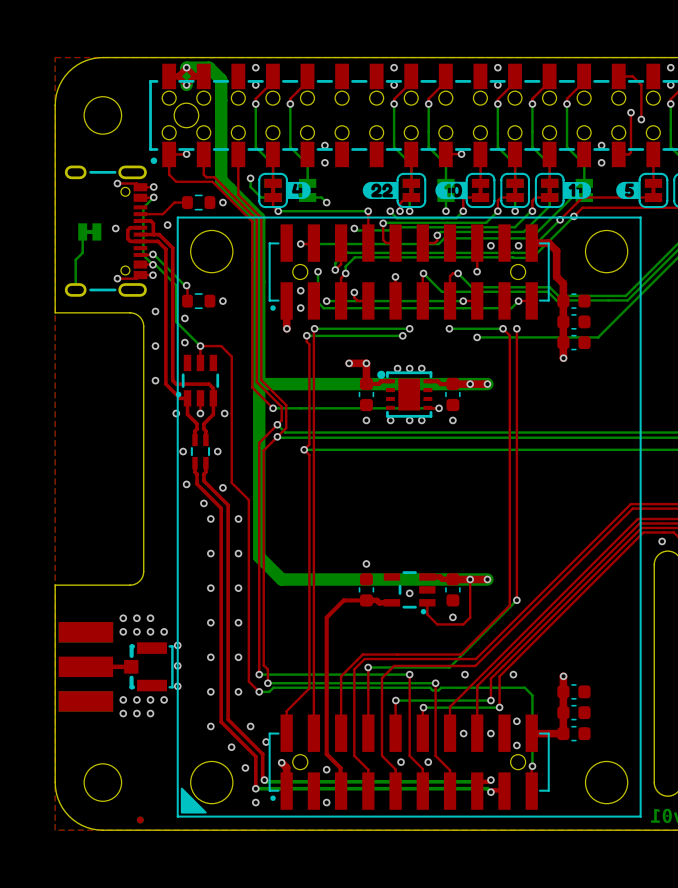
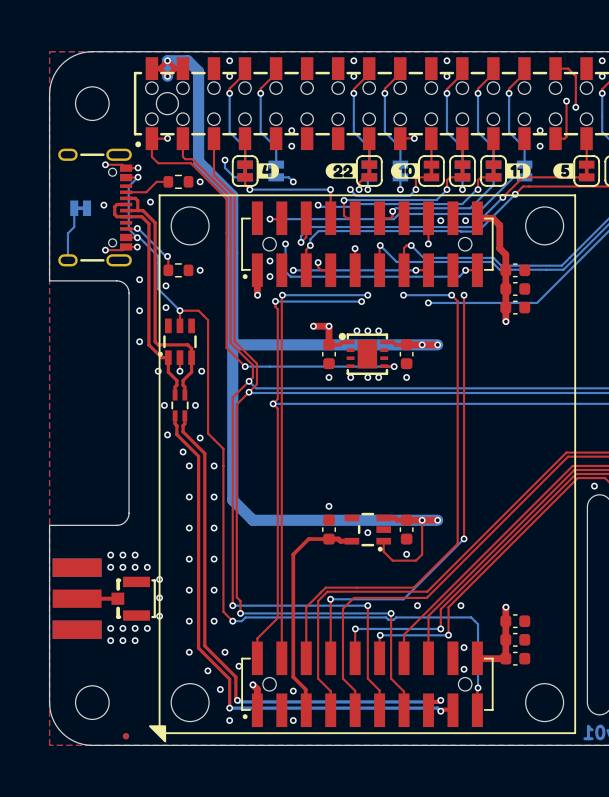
via: (463, 733) -> none
via: (490, 733) -> none
via: (401, 762) -> none
via: (428, 762) -> none
drawing: [180, 787, 207, 814] -> none
drawing: none -> [149, 725, 167, 743]

